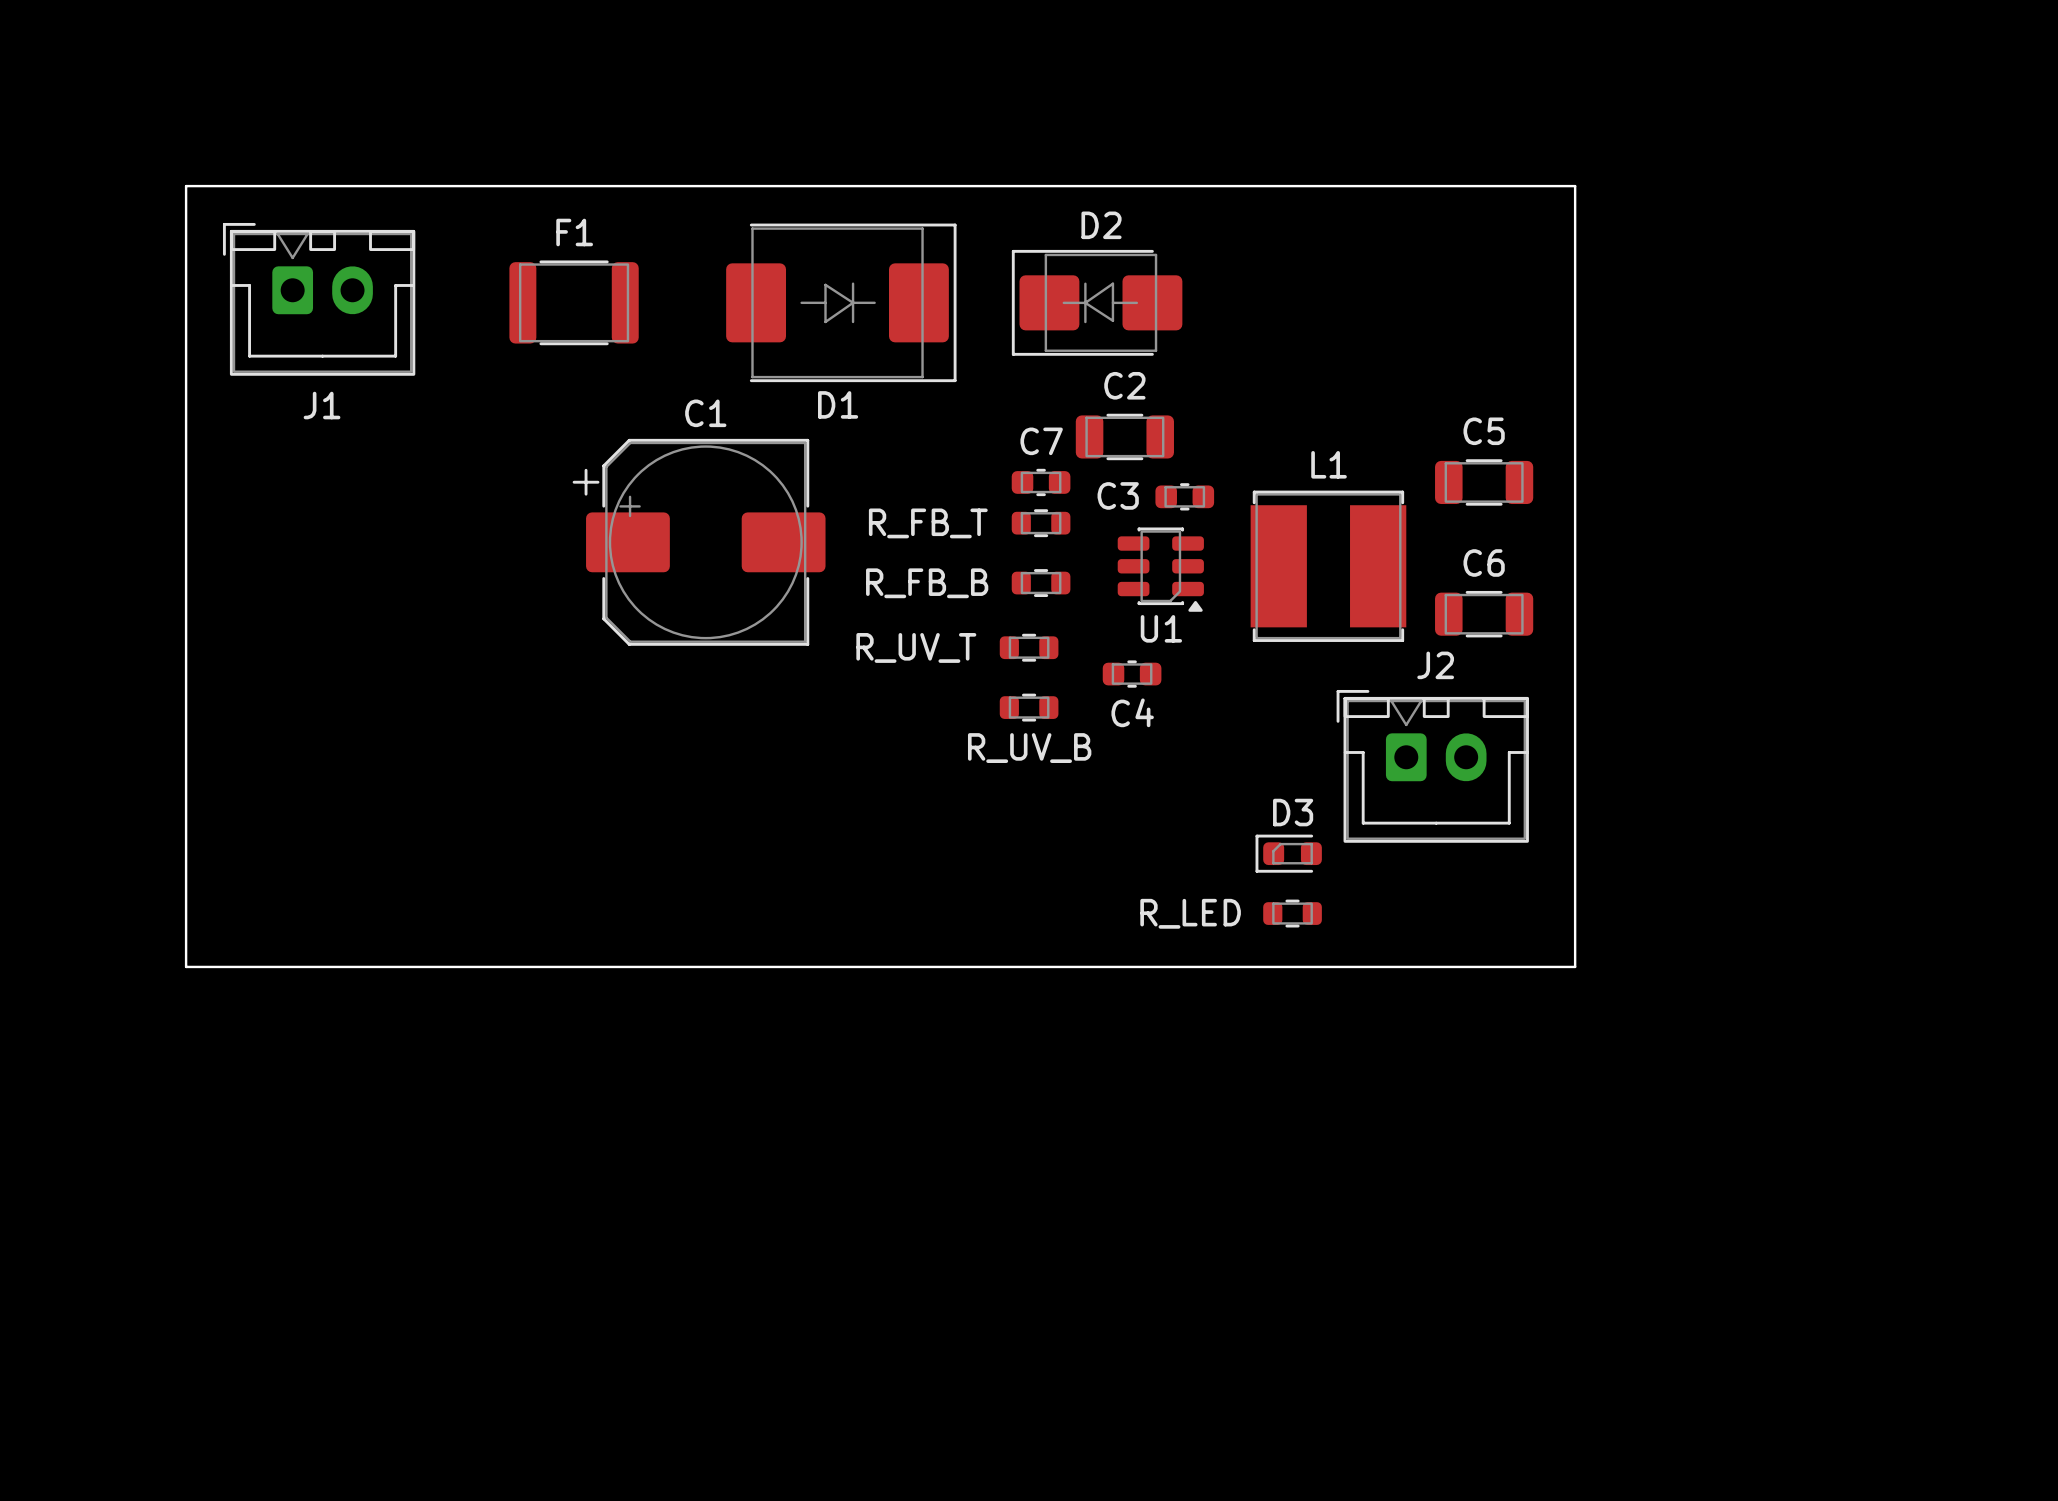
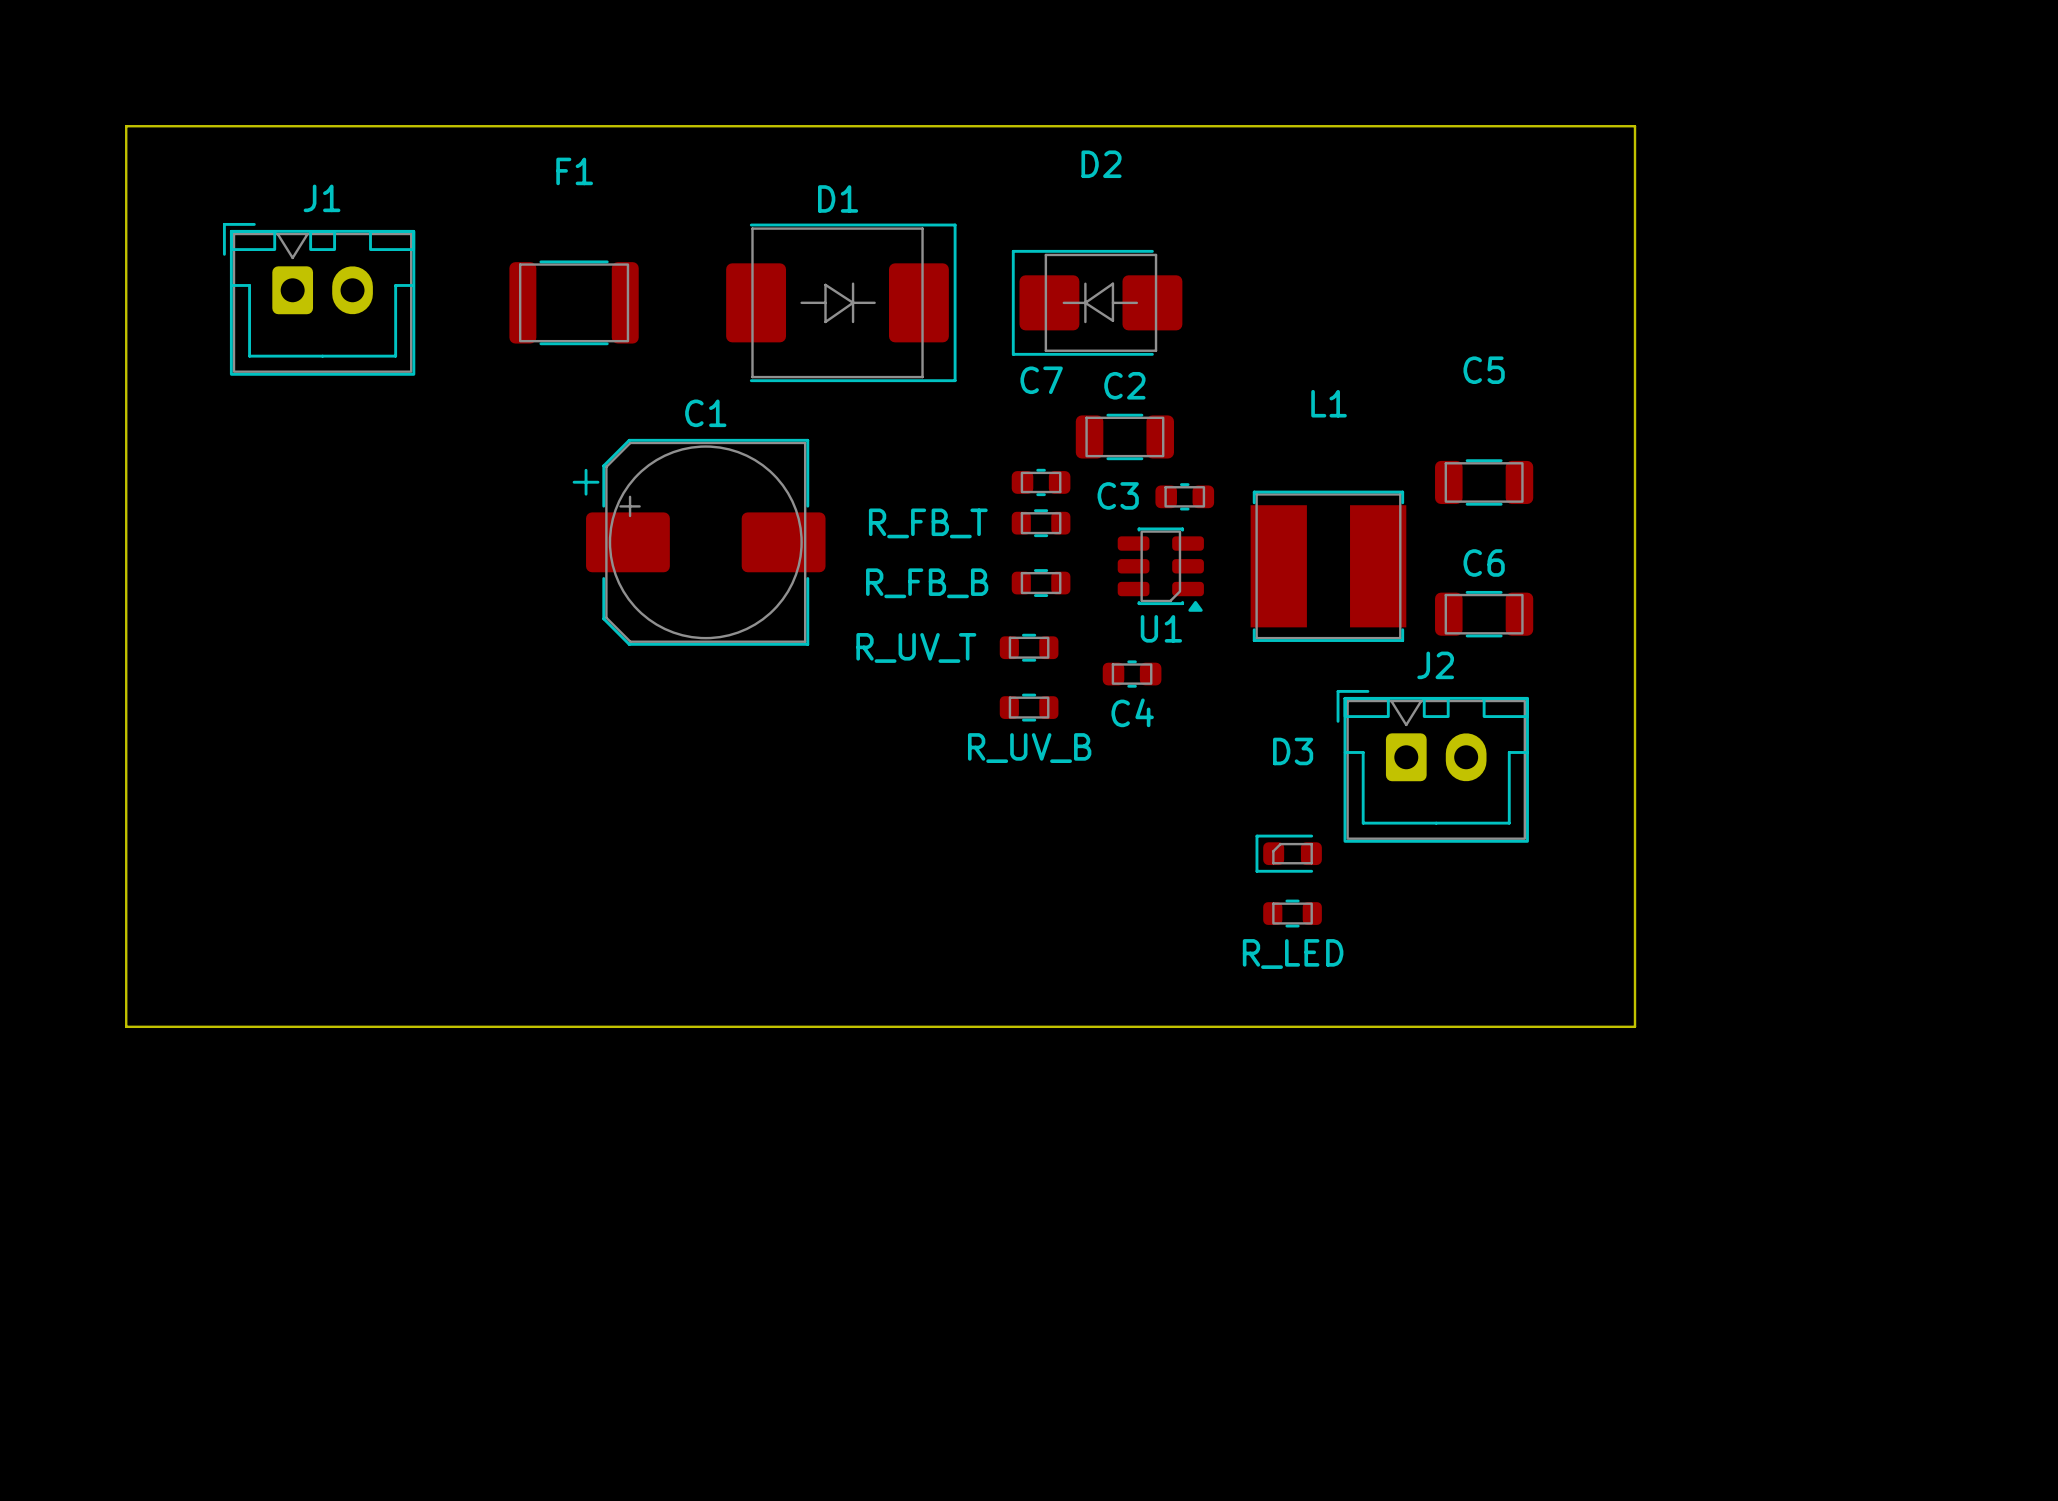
board edge: (186, 186) (1575, 186) (1575, 966) (186, 966) (186, 186) -> (126, 126) (126, 1026) (1635, 1026) (1635, 126) (126, 126)
D2 name position: D2 (1101, 225) -> D2 (1101, 164)
F1 name position: F1 (574, 232) -> F1 (574, 171)
D1 name position: D1 (838, 404) -> D1 (838, 198)
J1 name position: J1 (322, 405) -> J1 (322, 198)
C5 name position: C5 (1484, 431) -> C5 (1484, 370)
C7 name position: C7 (1041, 441) -> C7 (1041, 380)
L1 name position: L1 (1329, 464) -> L1 (1329, 403)
D3 name position: D3 (1293, 812) -> D3 (1293, 751)
R_LED name position: R_LED (1190, 913) -> R_LED (1293, 954)

